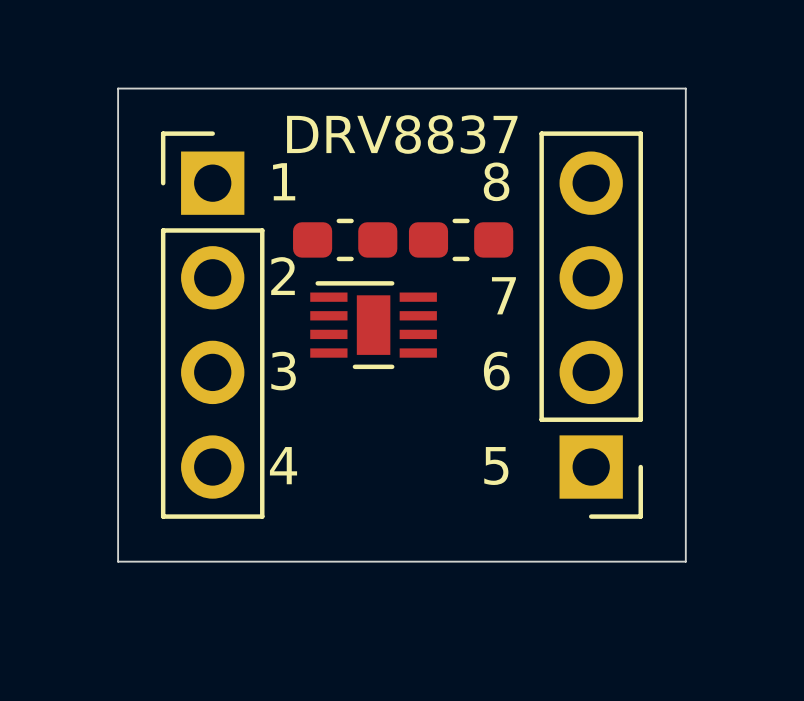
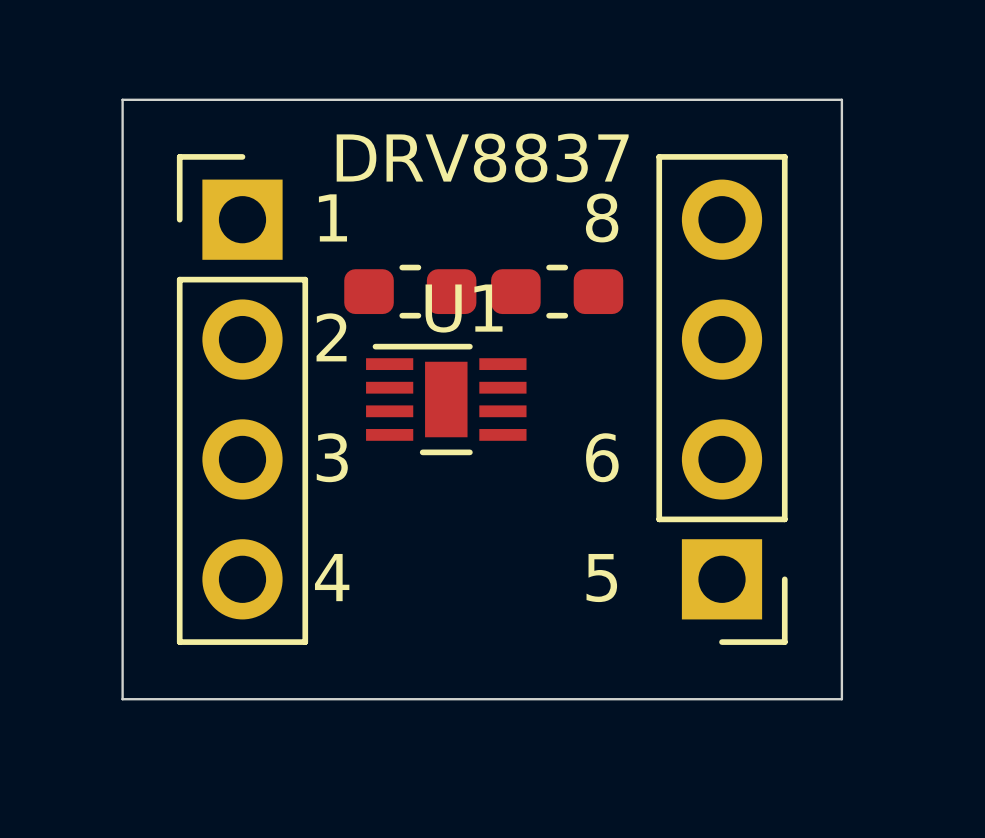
U1 name: none -> U1 (464, 308)
text: 7 (503, 295) -> none

